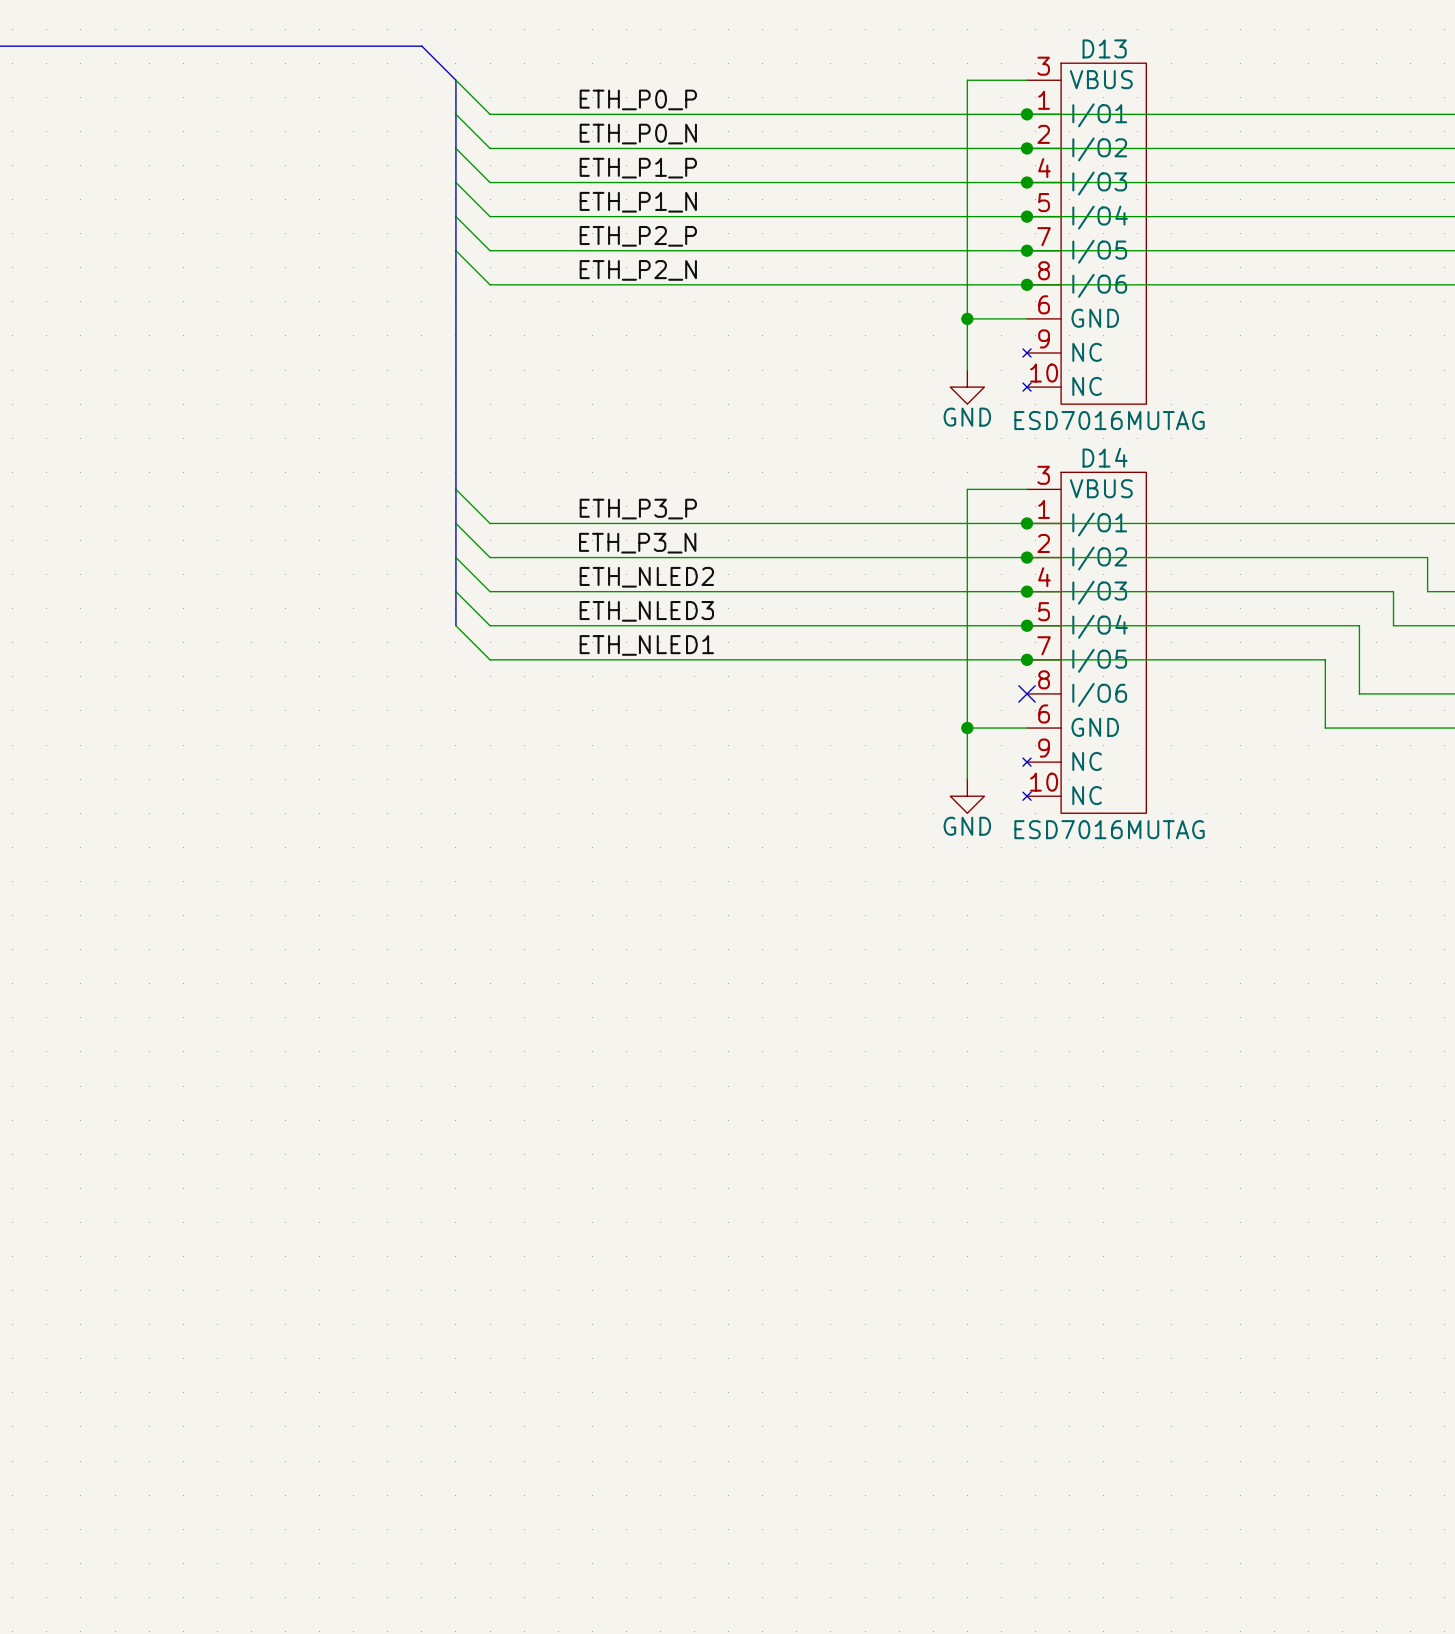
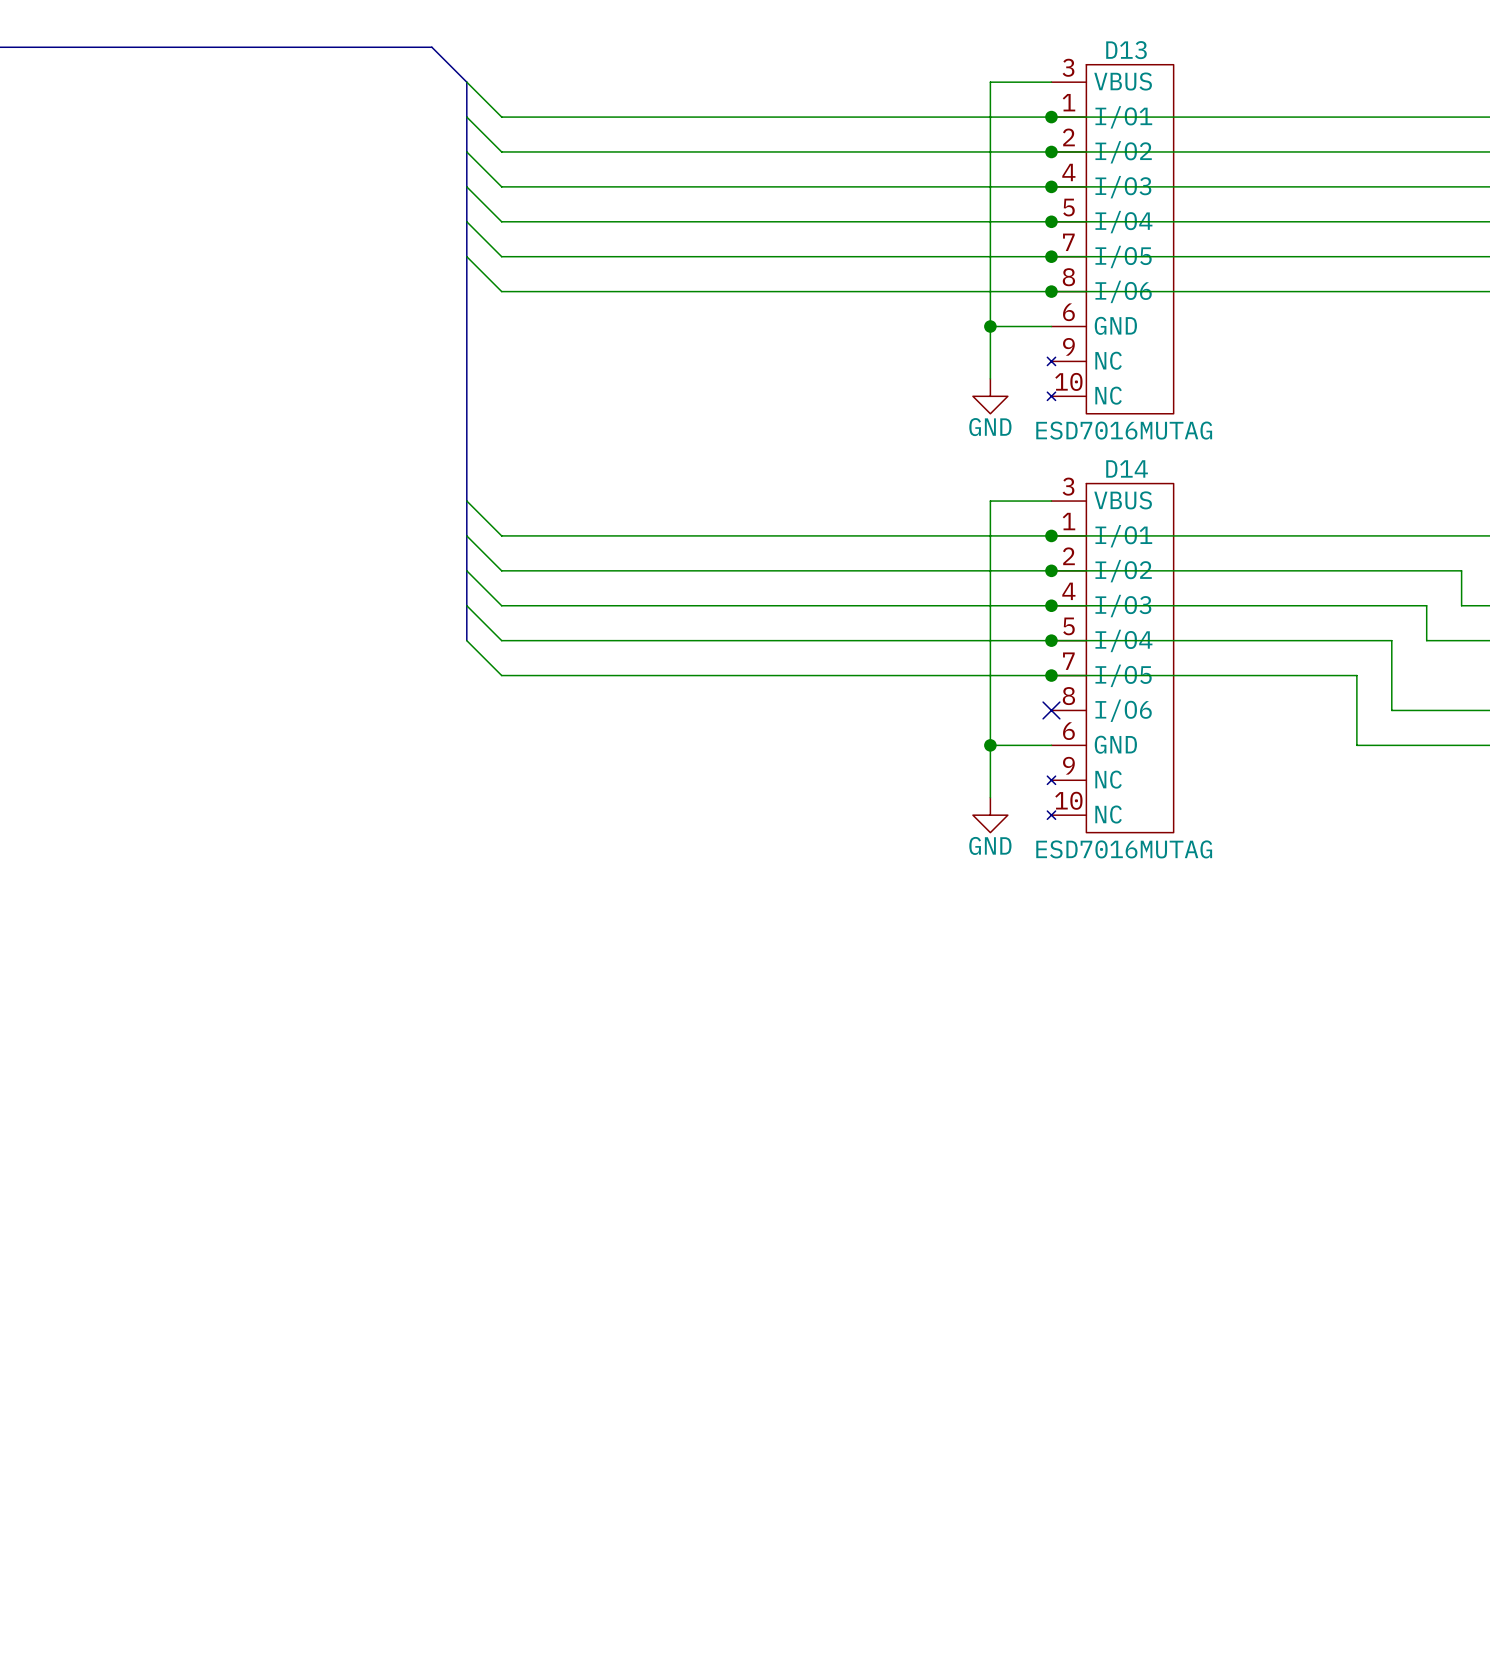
label: ETH_P0_P (638, 99) -> none
label: ETH_P0_N (638, 134) -> none
label: ETH_P1_P (638, 168) -> none
label: ETH_P1_N (638, 202) -> none
label: ETH_P2_P (638, 236) -> none
label: ETH_P2_N (638, 270) -> none
label: ETH_P3_P (638, 509) -> none
label: ETH_P3_N (637, 543) -> none
label: ETH_NLED2 (646, 577) -> none
label: ETH_NLED3 (646, 611) -> none
label: ETH_NLED1 (646, 645) -> none

